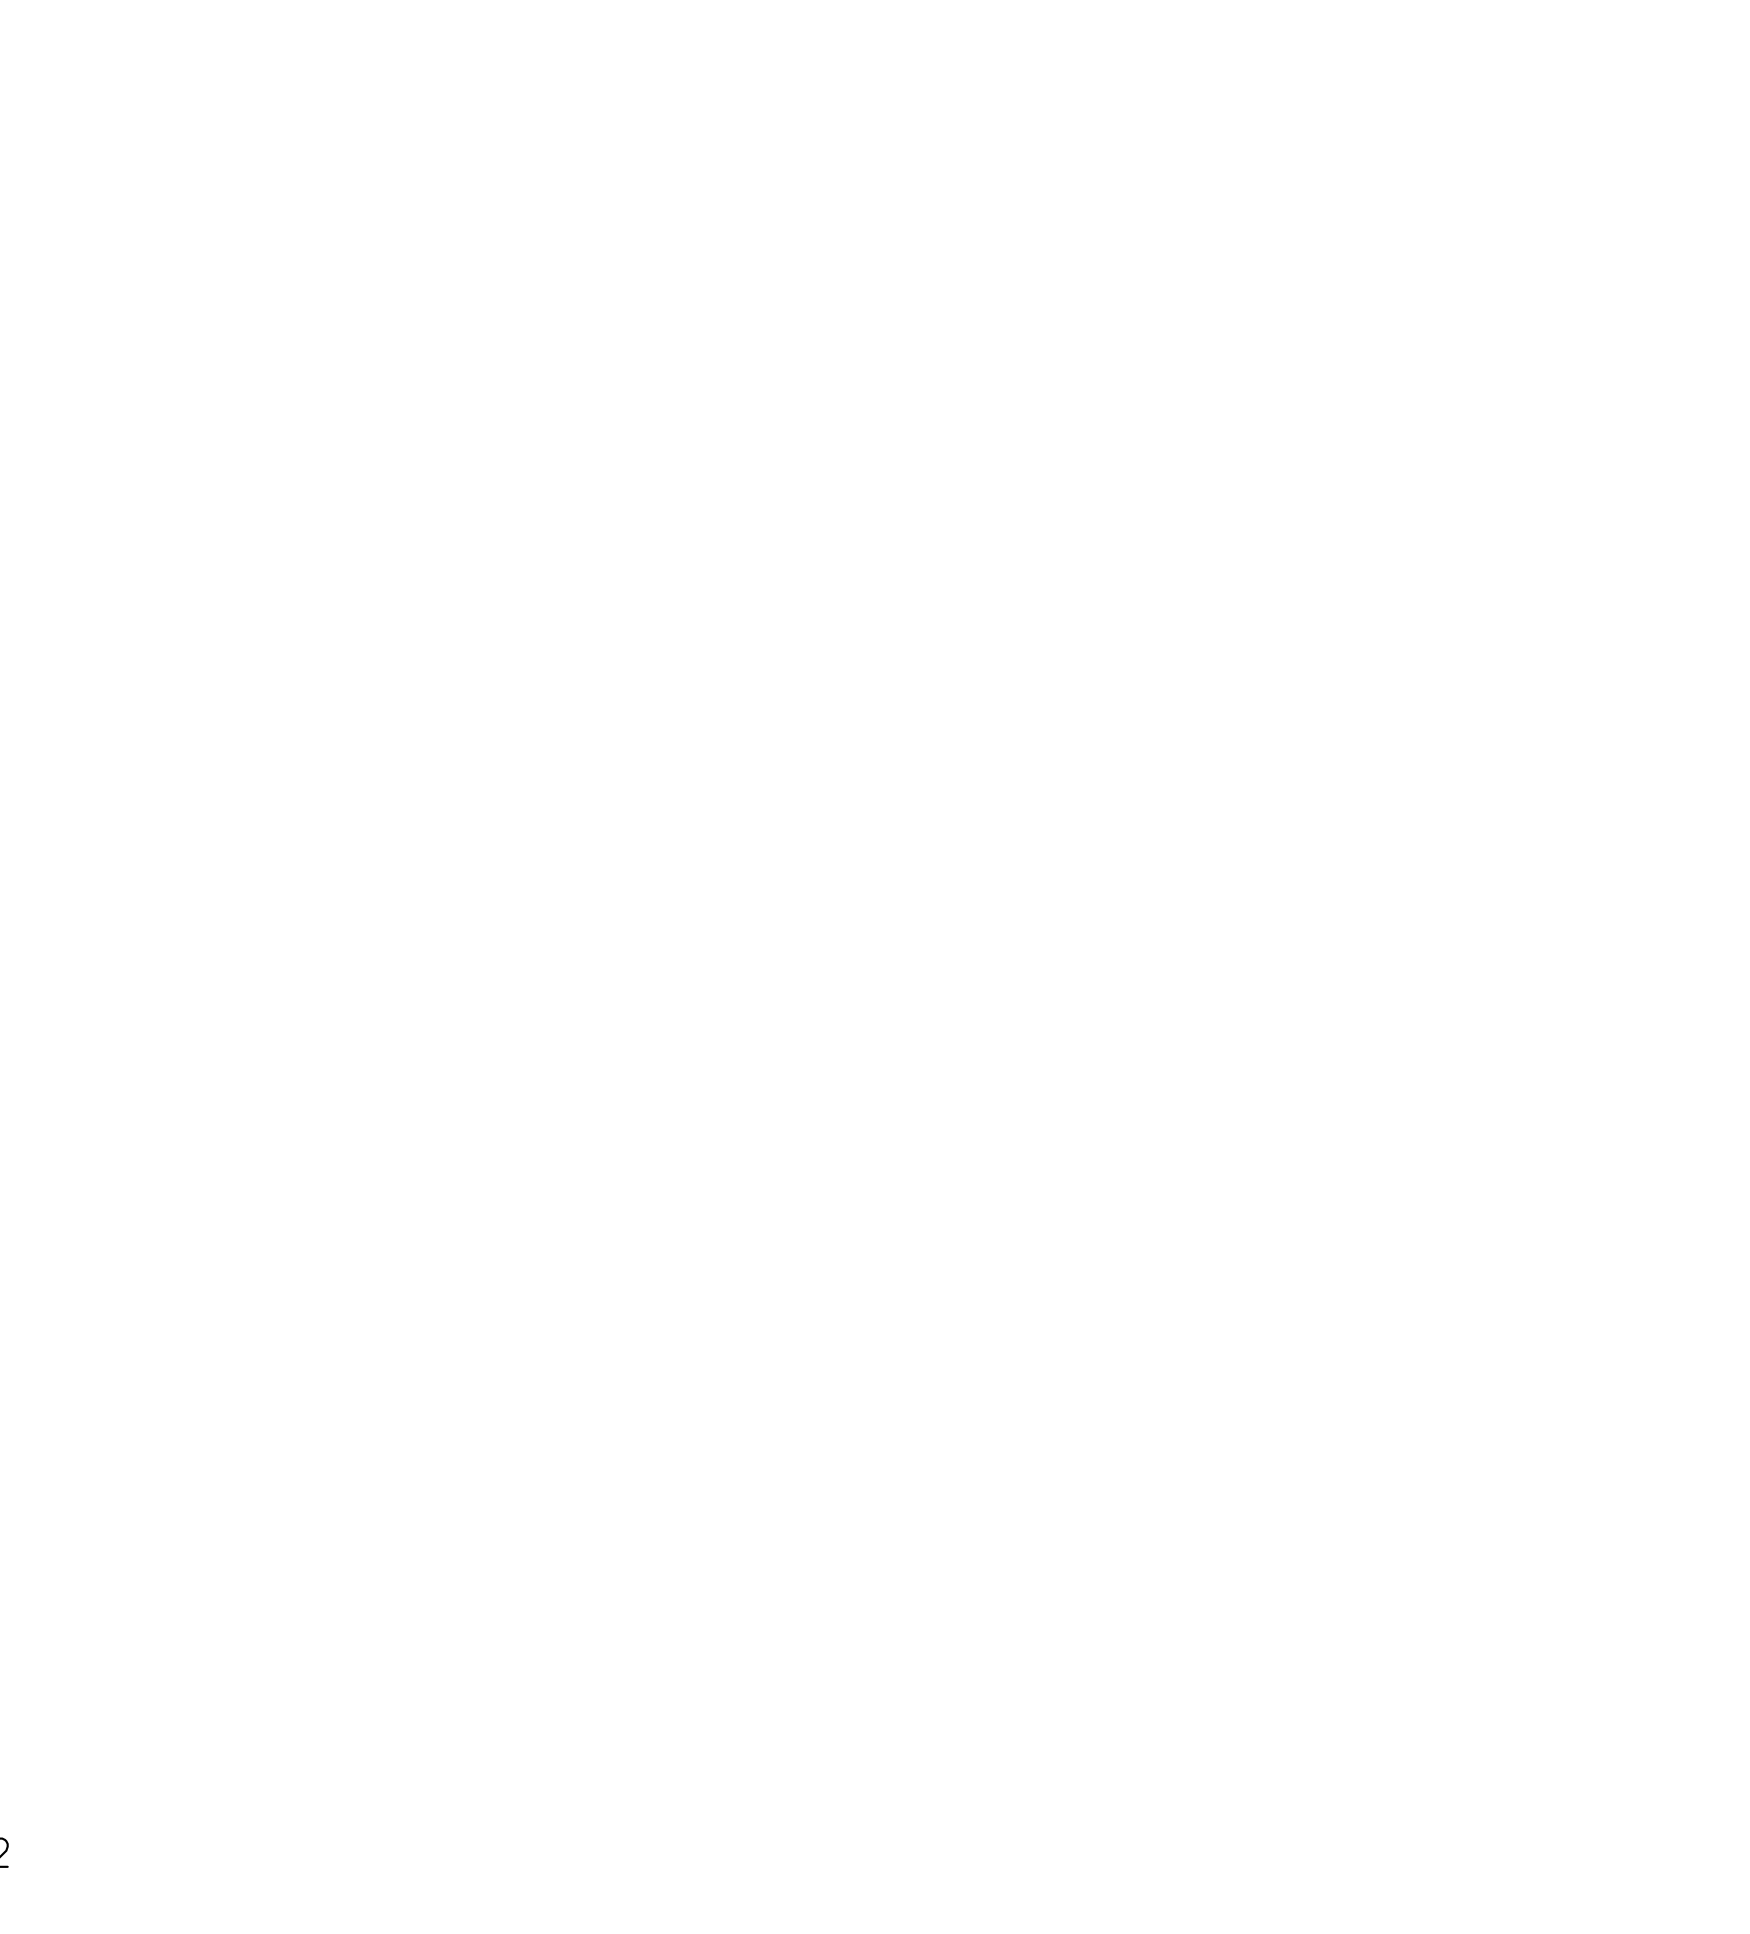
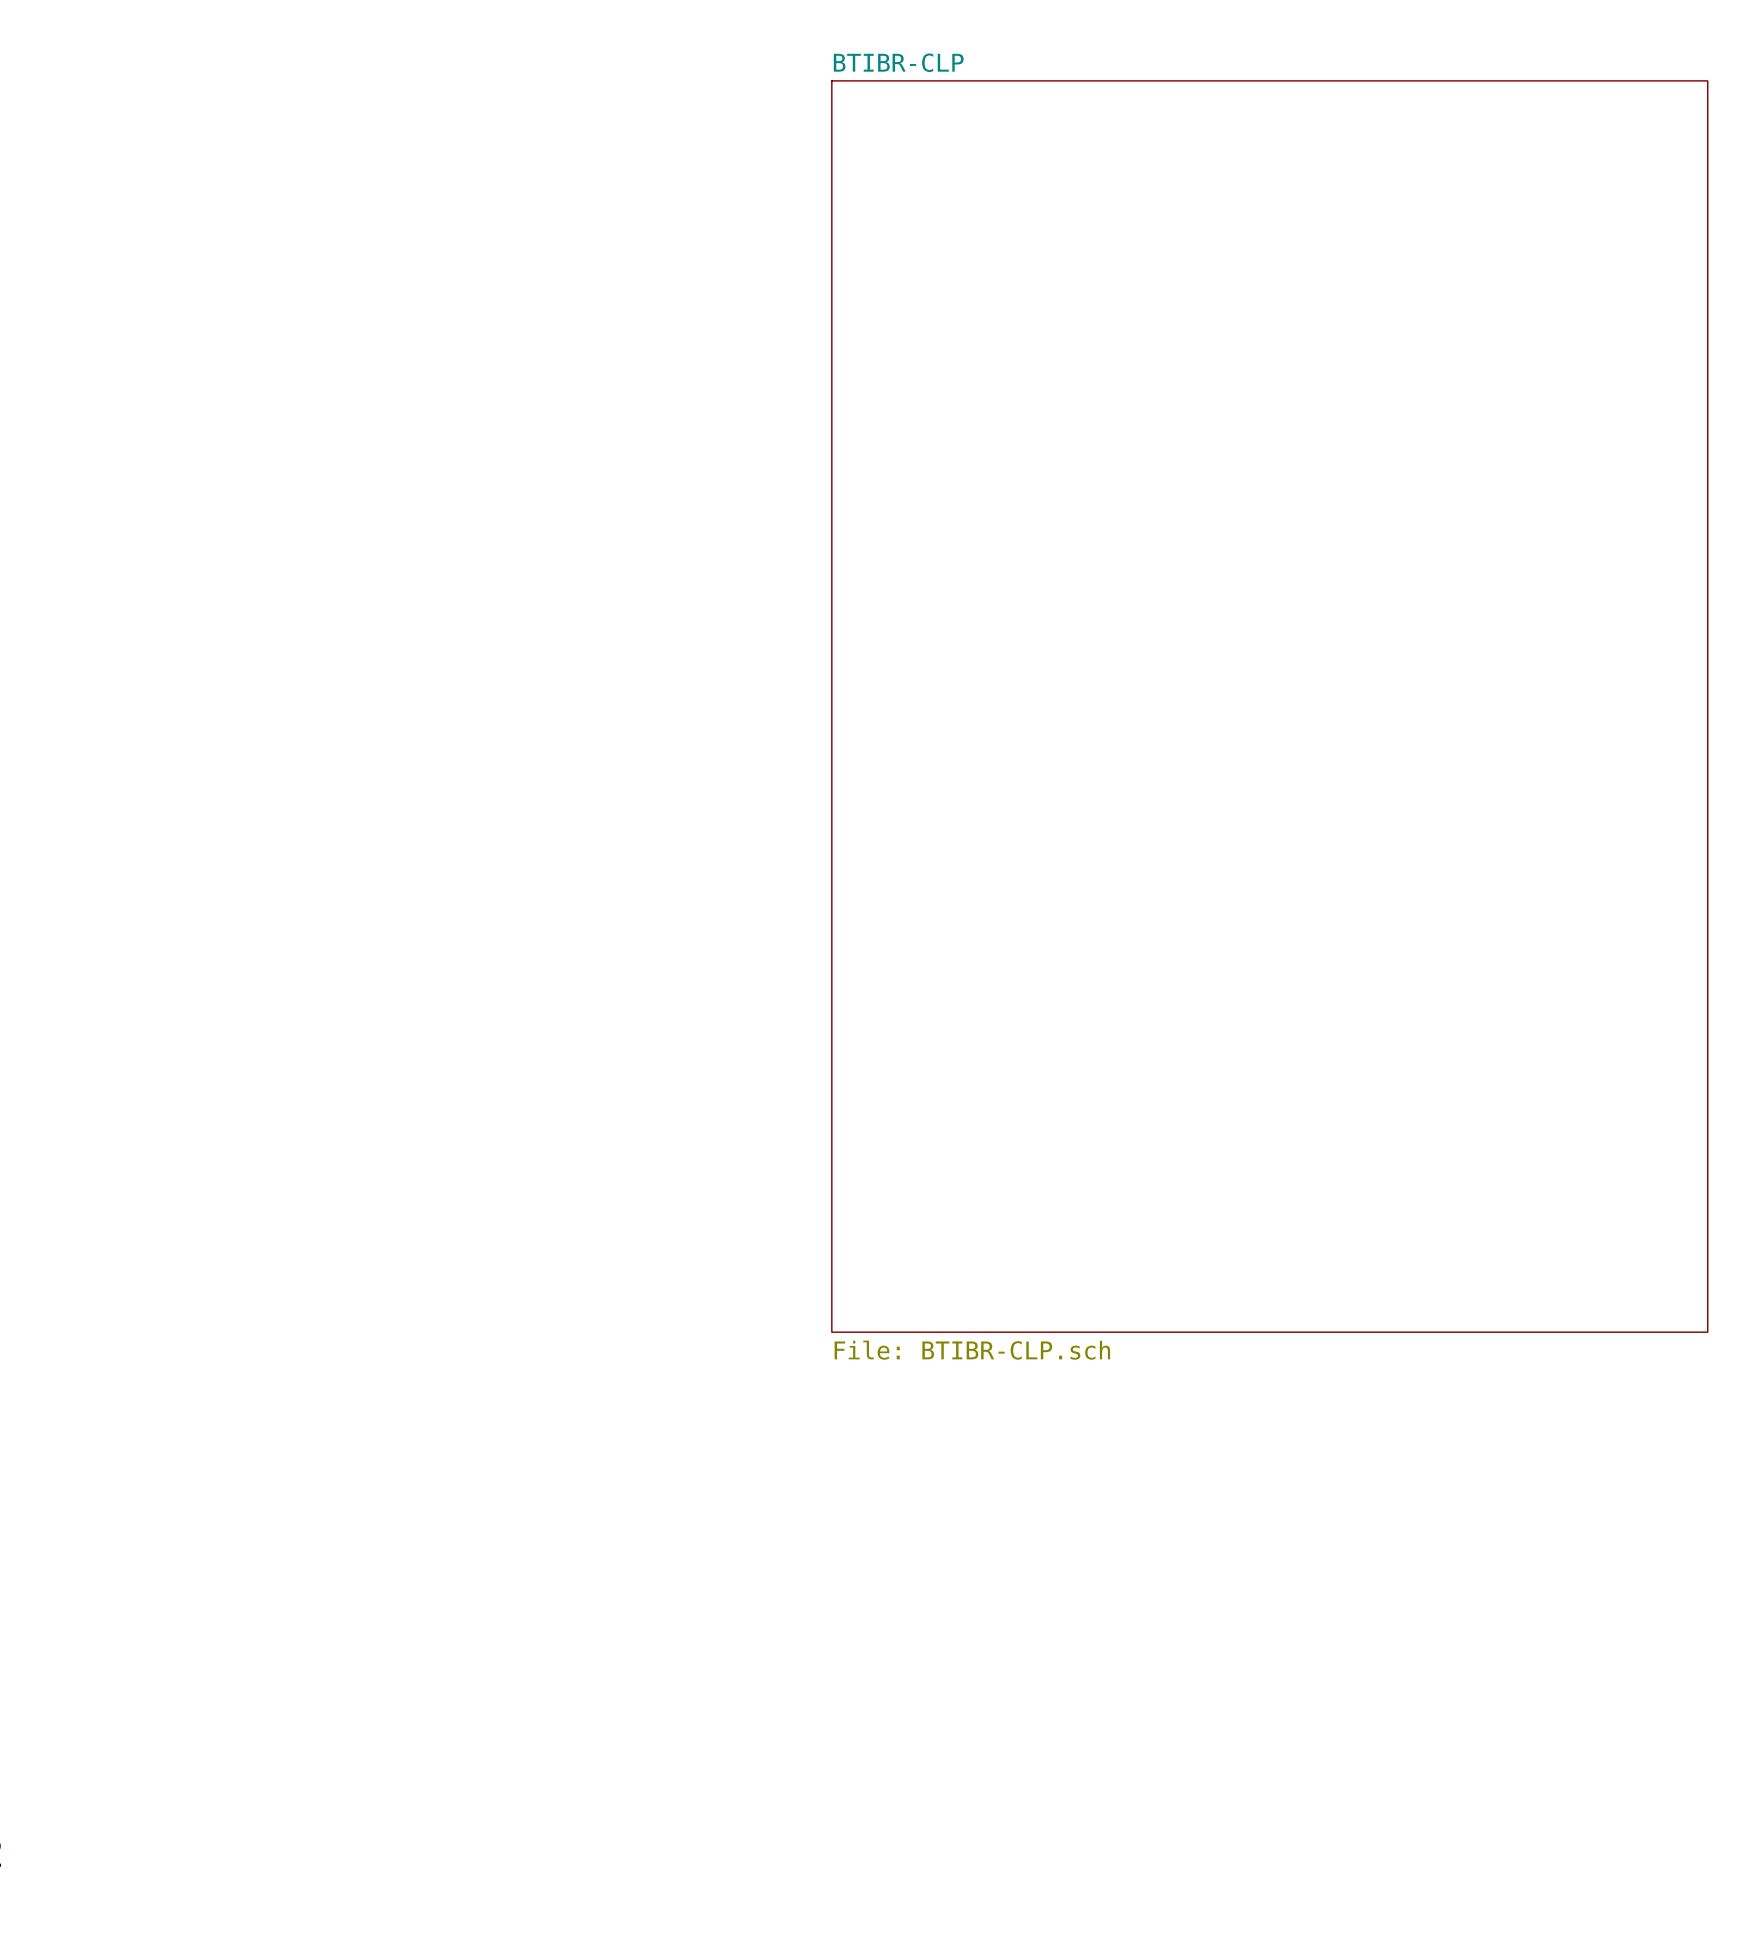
sheet BTIBR-CLP: none -> File: BTIBR-CLP.sch (1269, 706)

